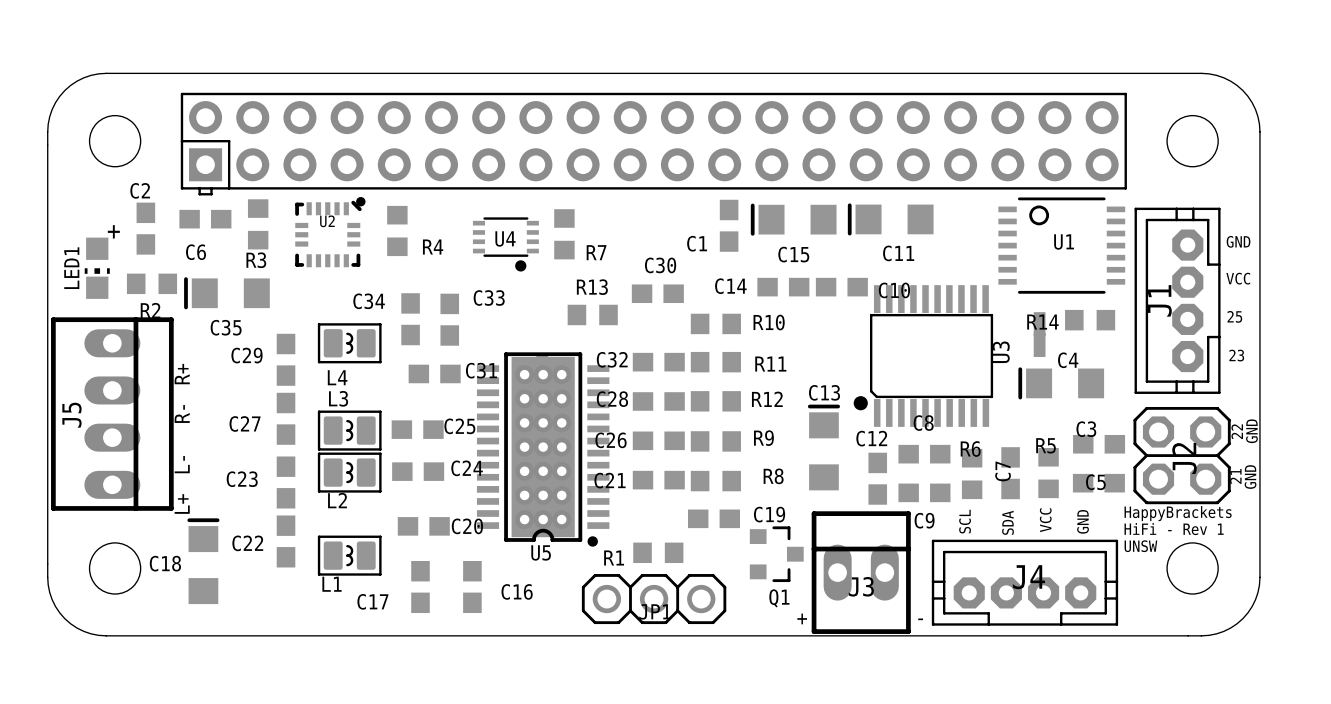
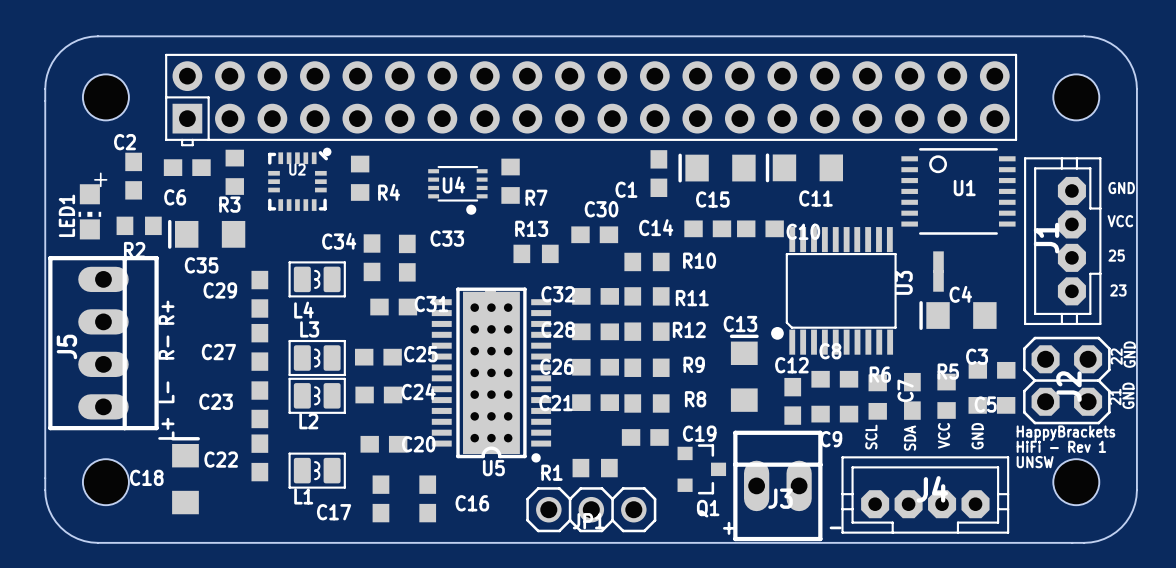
R14: (1090, 320) -> none

